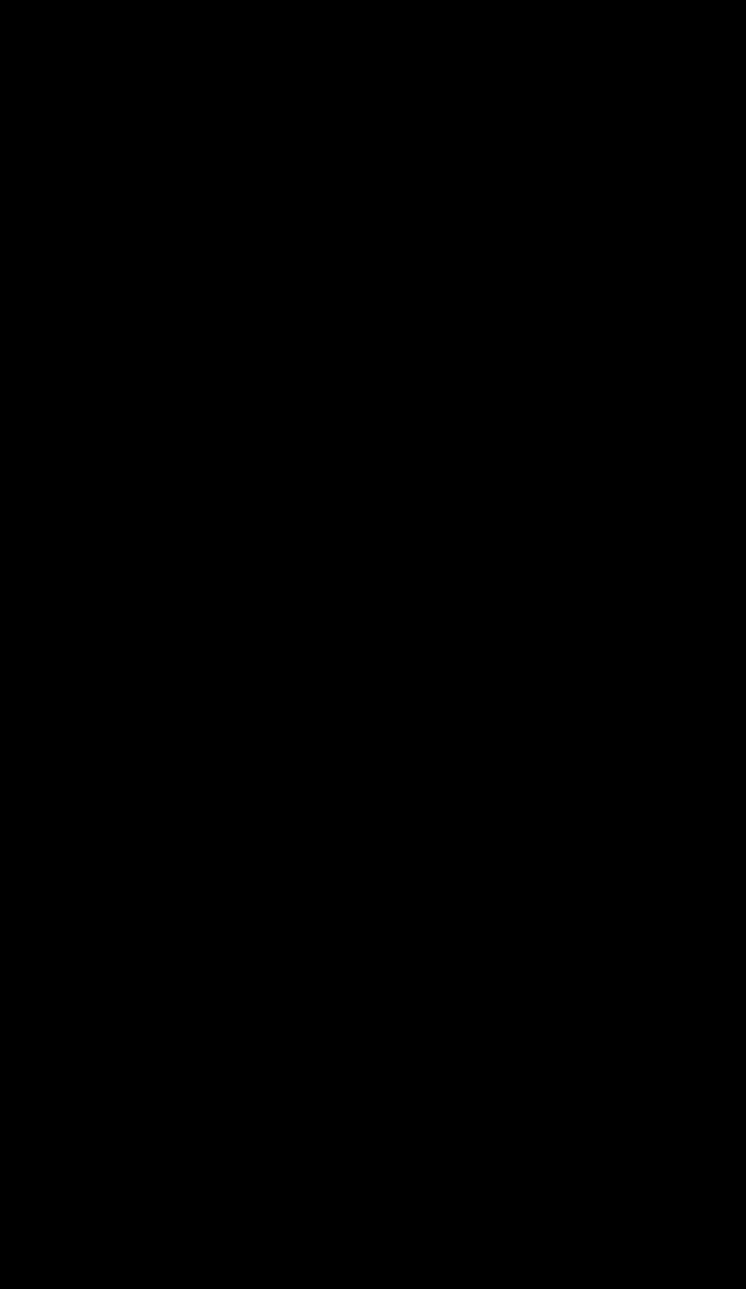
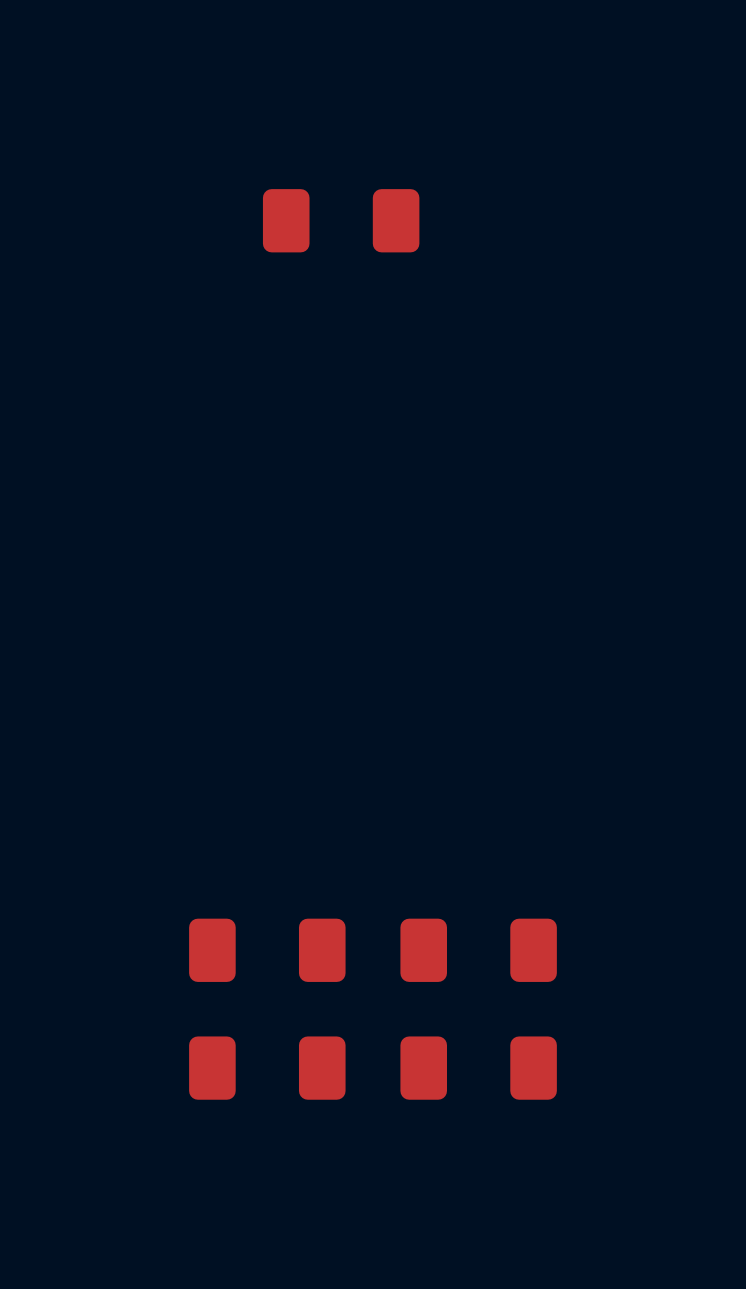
part: none -> (341, 220)
part: none -> (267, 950)
part: none -> (478, 950)
part: none -> (267, 1068)
part: none -> (478, 1068)

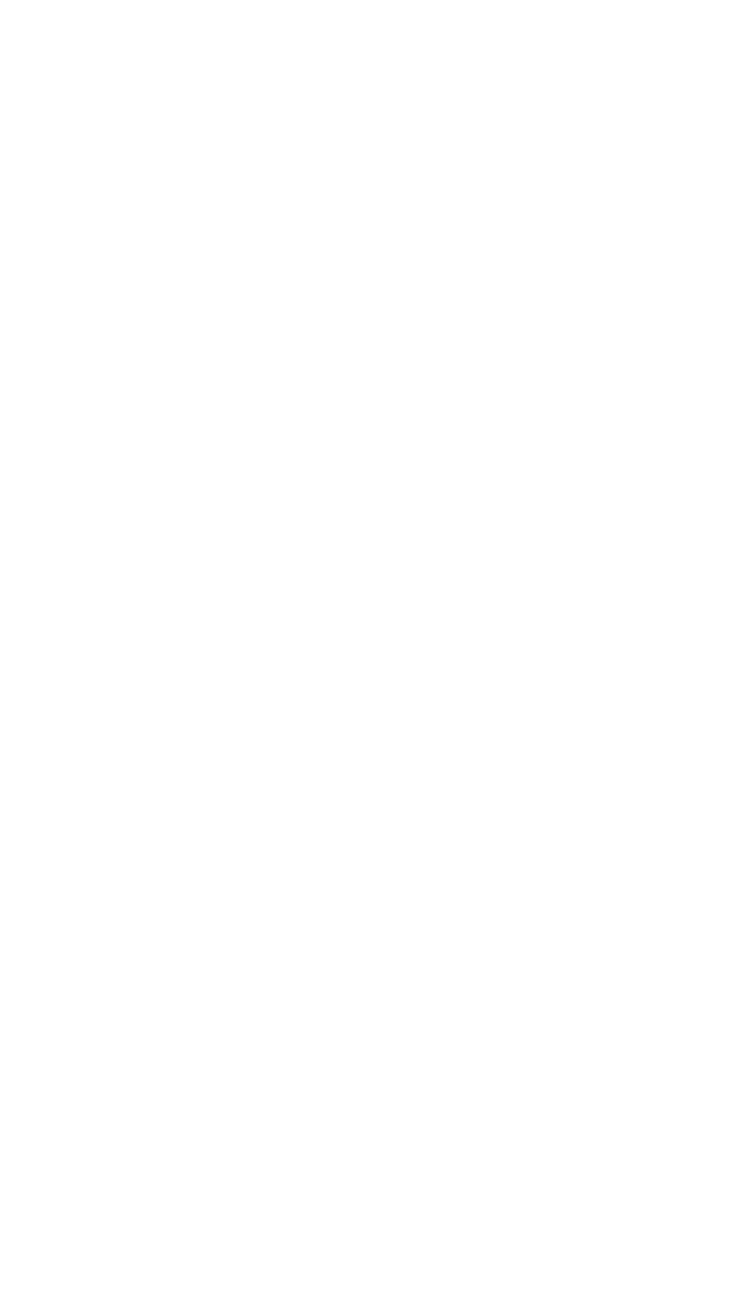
part: (341, 220) -> none
part: (267, 950) -> none
part: (478, 950) -> none
part: (267, 1068) -> none
part: (478, 1068) -> none

